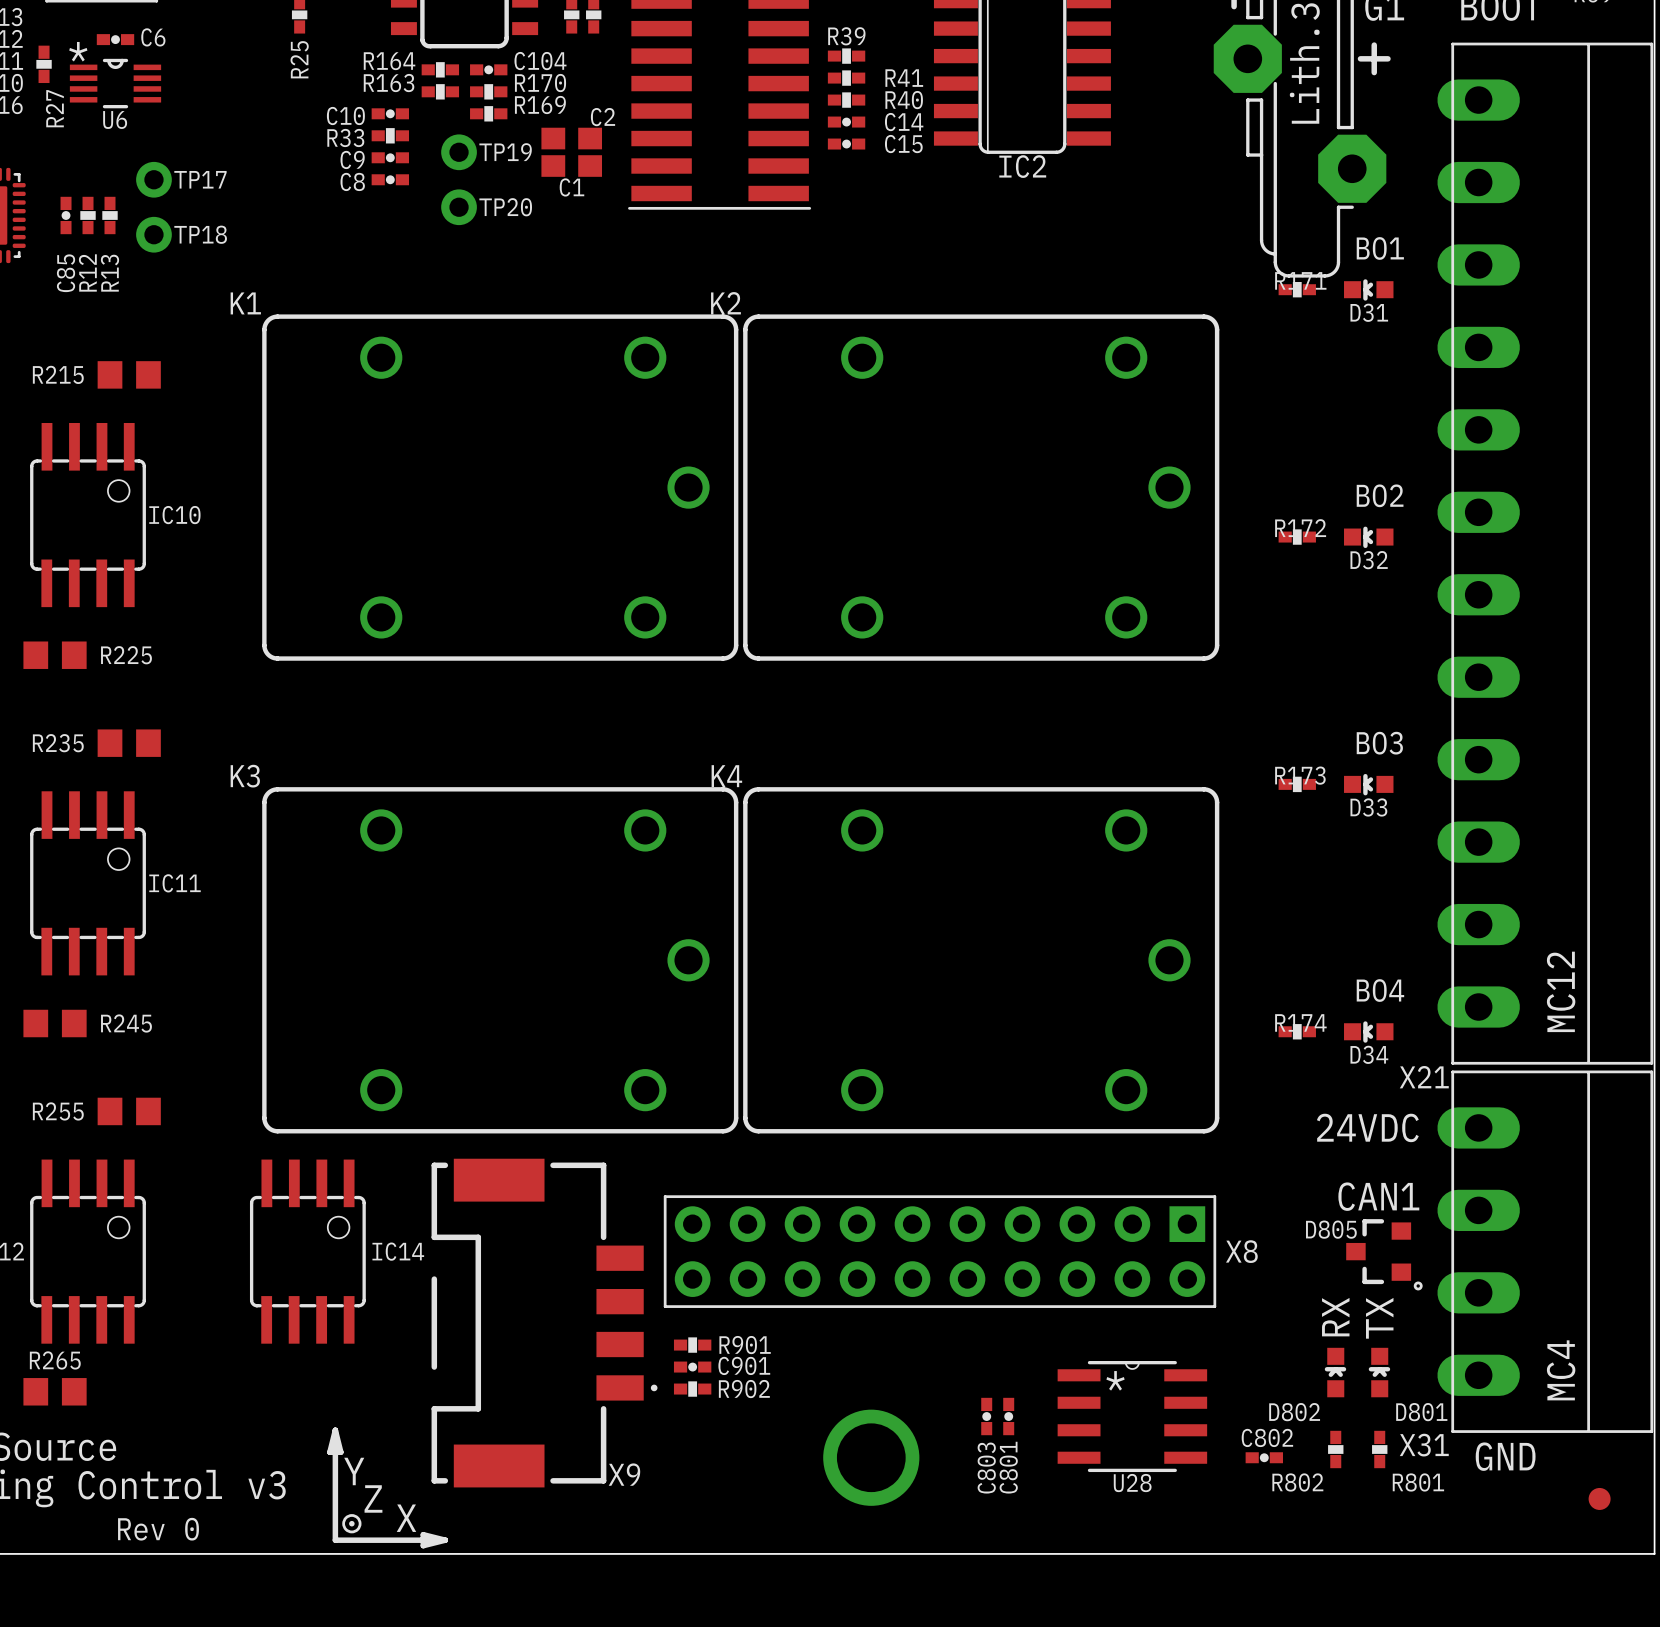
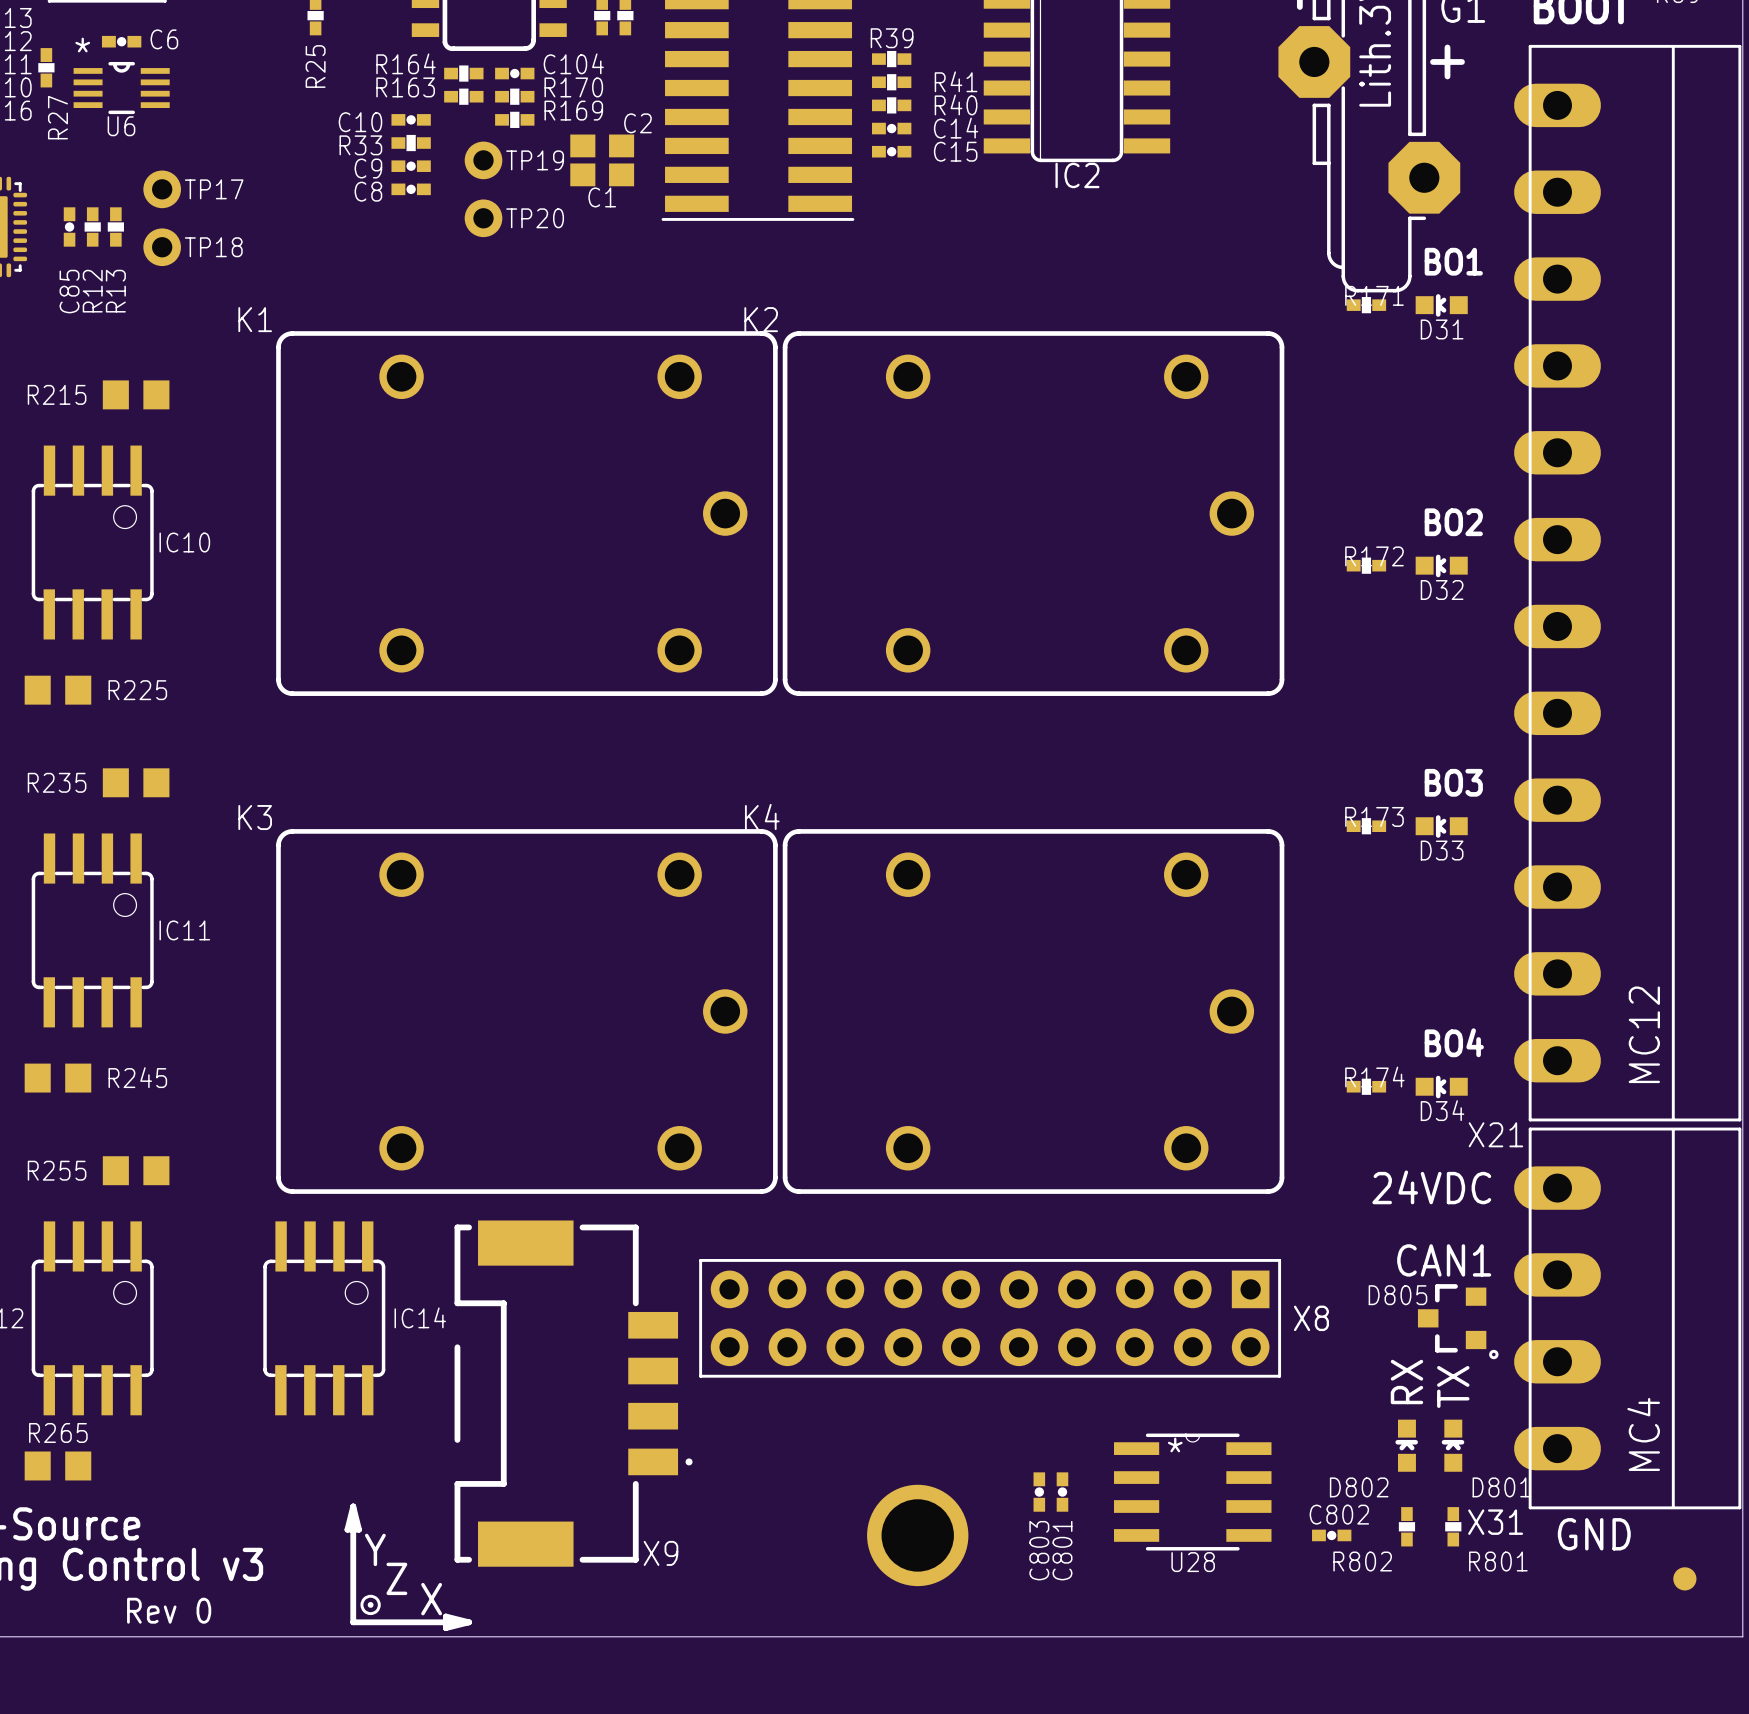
R901: (692, 1345) -> none
C901: (692, 1367) -> none
R902: (692, 1389) -> none

